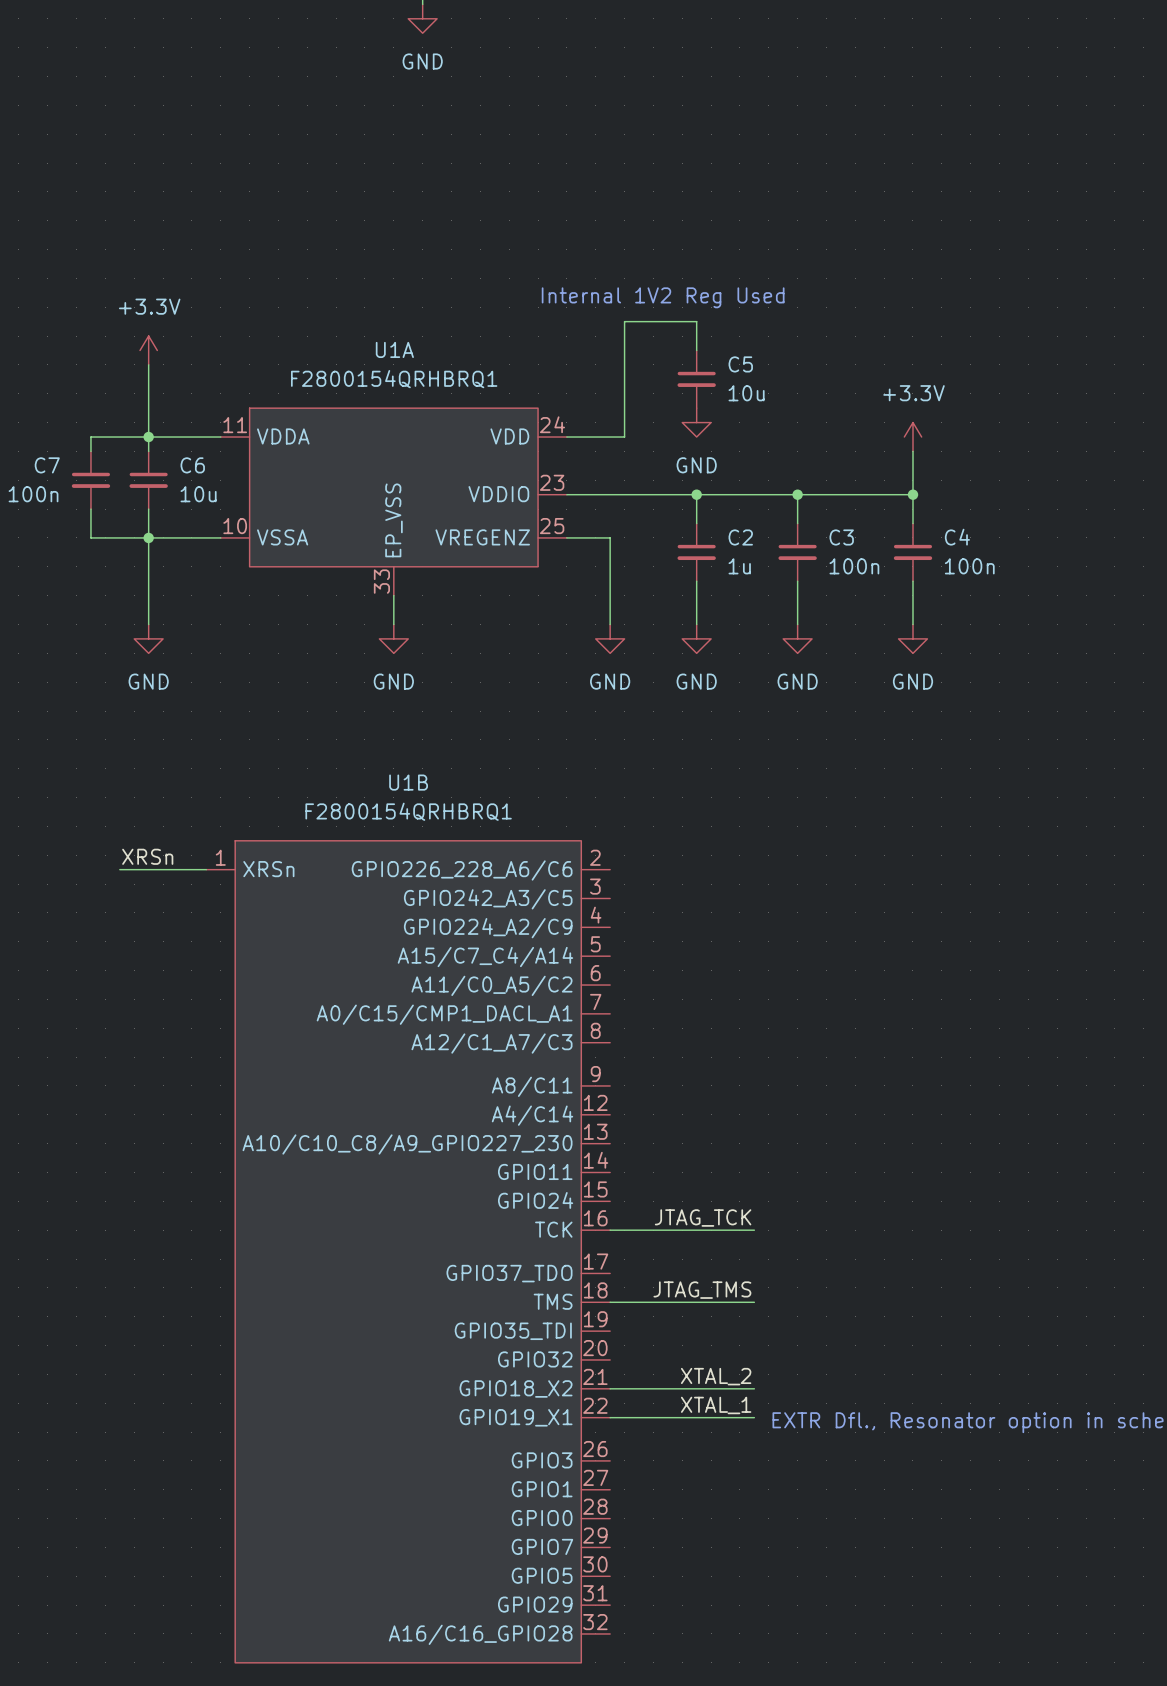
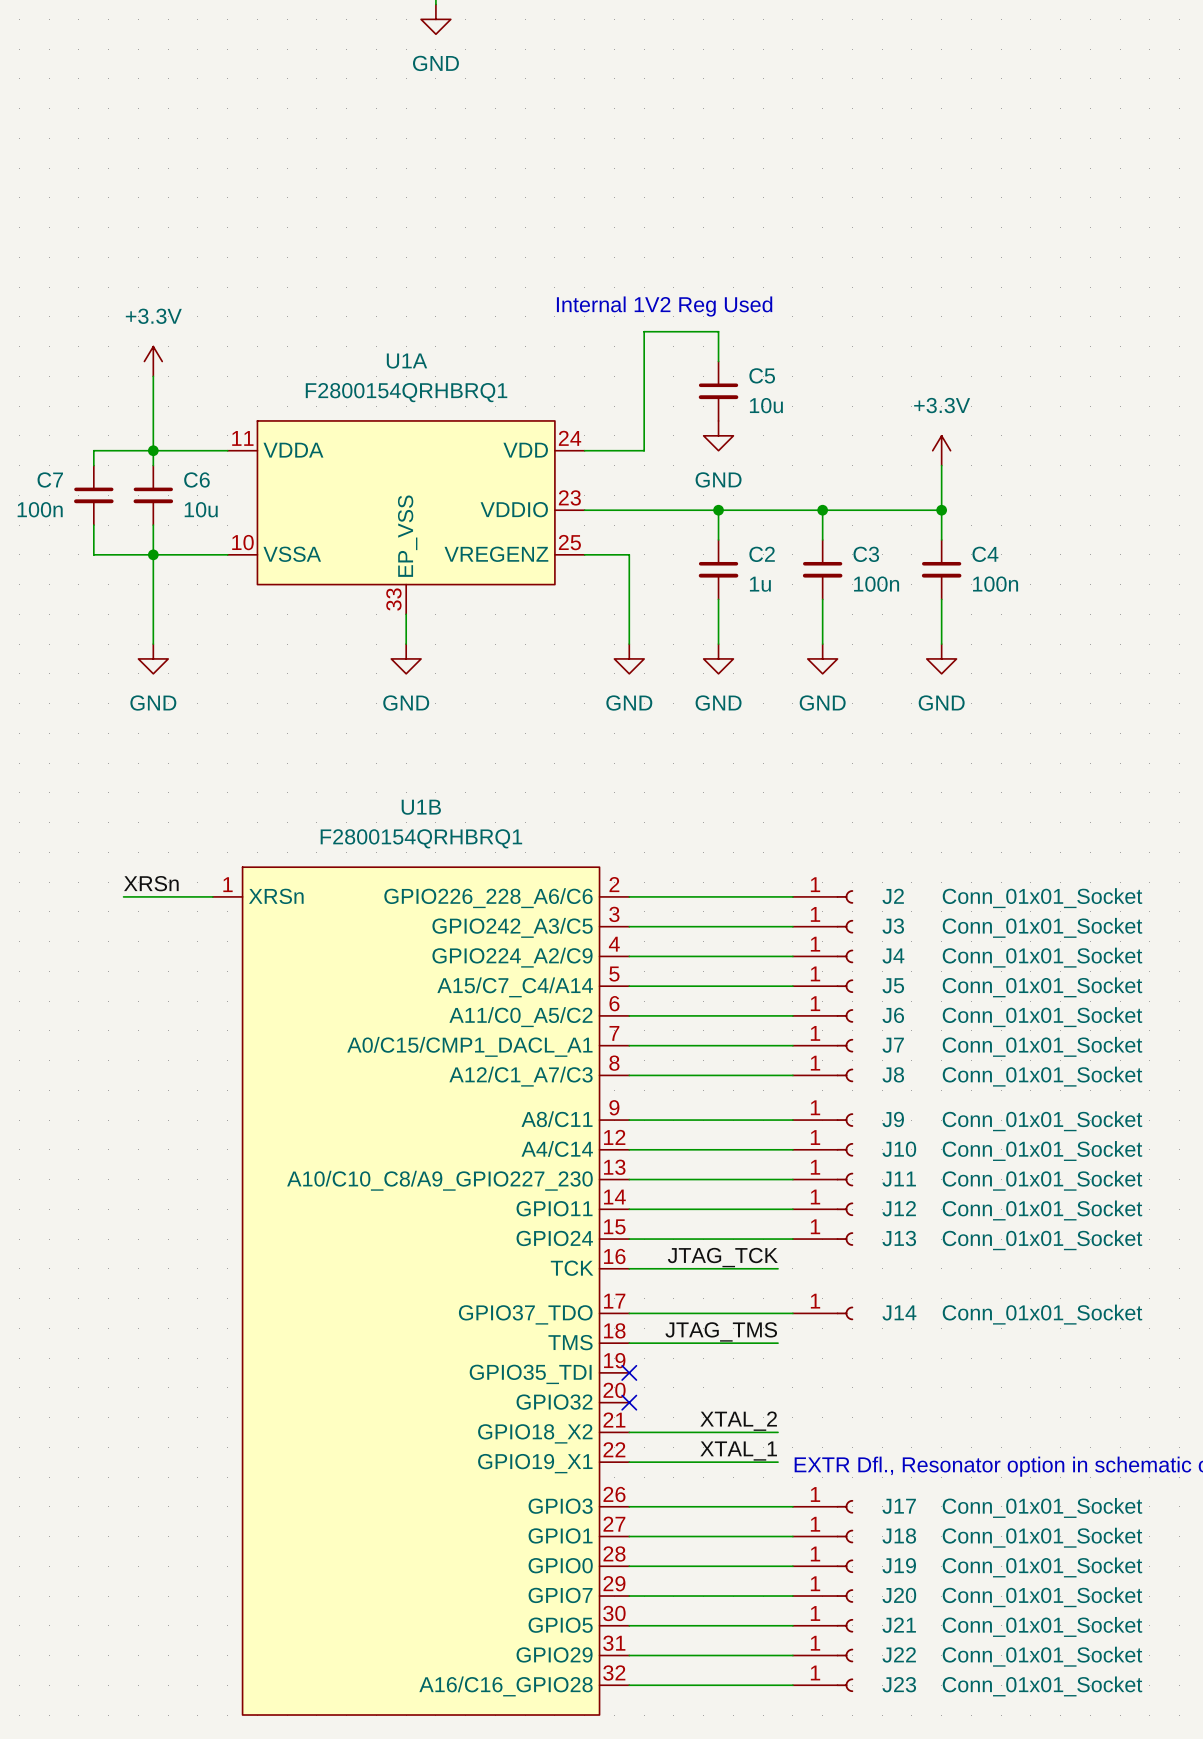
wire: none -> (629, 896) (792, 896)
J2: none -> Conn_01x01_Socket (823, 896)
wire: none -> (629, 926) (792, 926)
J3: none -> Conn_01x01_Socket (823, 926)
wire: none -> (629, 956) (792, 956)
J4: none -> Conn_01x01_Socket (823, 956)
wire: none -> (629, 986) (792, 986)
J5: none -> Conn_01x01_Socket (823, 986)
wire: none -> (629, 1015) (792, 1015)
J6: none -> Conn_01x01_Socket (823, 1015)
wire: none -> (629, 1045) (792, 1045)
J7: none -> Conn_01x01_Socket (823, 1045)
wire: none -> (629, 1075) (792, 1075)
J8: none -> Conn_01x01_Socket (823, 1075)
wire: none -> (629, 1120) (792, 1120)
J9: none -> Conn_01x01_Socket (823, 1120)
wire: none -> (629, 1149) (792, 1149)
J10: none -> Conn_01x01_Socket (823, 1149)
wire: none -> (629, 1179) (792, 1179)
J11: none -> Conn_01x01_Socket (823, 1179)
wire: none -> (629, 1209) (792, 1209)
J12: none -> Conn_01x01_Socket (823, 1209)
wire: none -> (629, 1239) (792, 1239)
J13: none -> Conn_01x01_Socket (823, 1239)
wire: none -> (629, 1313) (792, 1313)
J14: none -> Conn_01x01_Socket (823, 1313)
no-connect mark: none -> (629, 1372)
no-connect mark: none -> (629, 1402)
wire: none -> (629, 1506) (792, 1506)
J17: none -> Conn_01x01_Socket (823, 1506)
wire: none -> (629, 1536) (792, 1536)
J18: none -> Conn_01x01_Socket (823, 1536)
wire: none -> (629, 1566) (792, 1566)
J19: none -> Conn_01x01_Socket (823, 1566)
wire: none -> (629, 1596) (792, 1596)
J20: none -> Conn_01x01_Socket (823, 1596)
wire: none -> (629, 1625) (792, 1625)
J21: none -> Conn_01x01_Socket (823, 1625)
wire: none -> (629, 1655) (792, 1655)
J22: none -> Conn_01x01_Socket (823, 1655)
wire: none -> (629, 1685) (792, 1685)
J23: none -> Conn_01x01_Socket (823, 1685)

